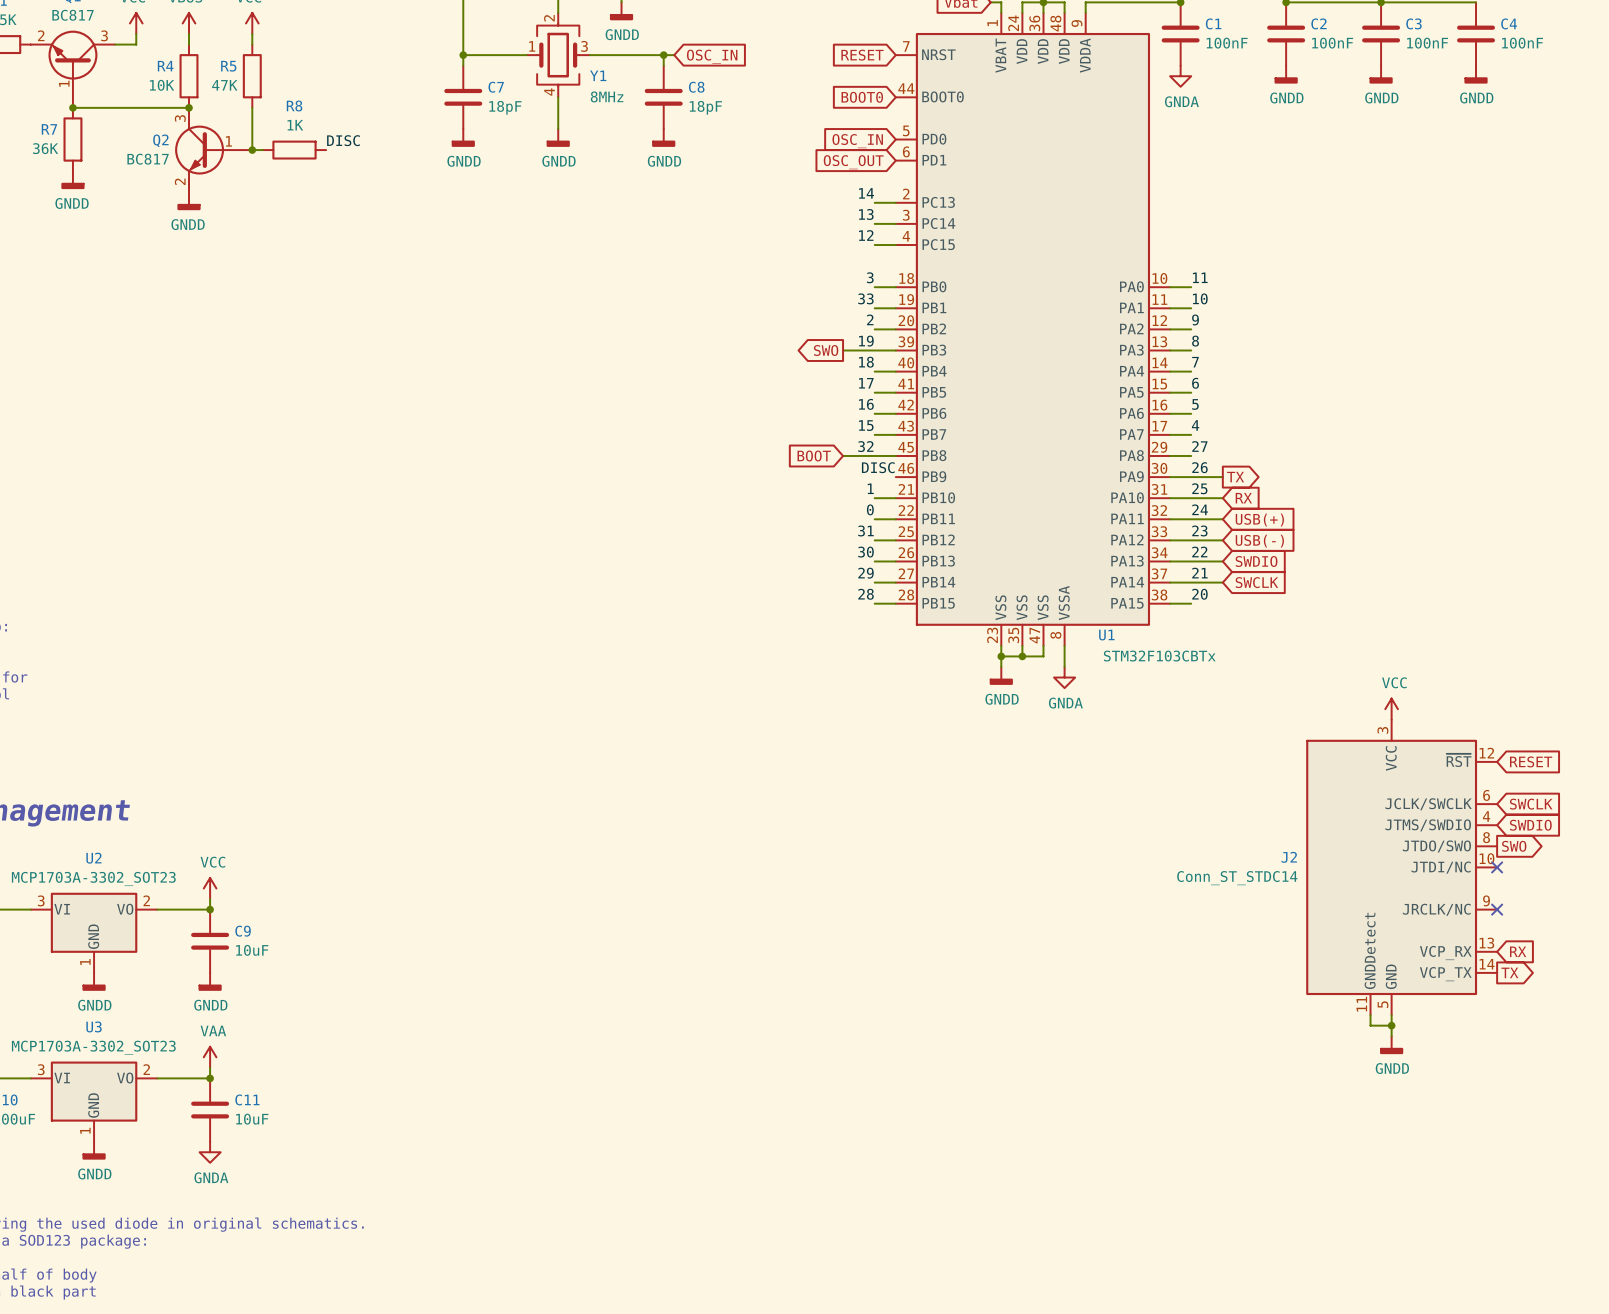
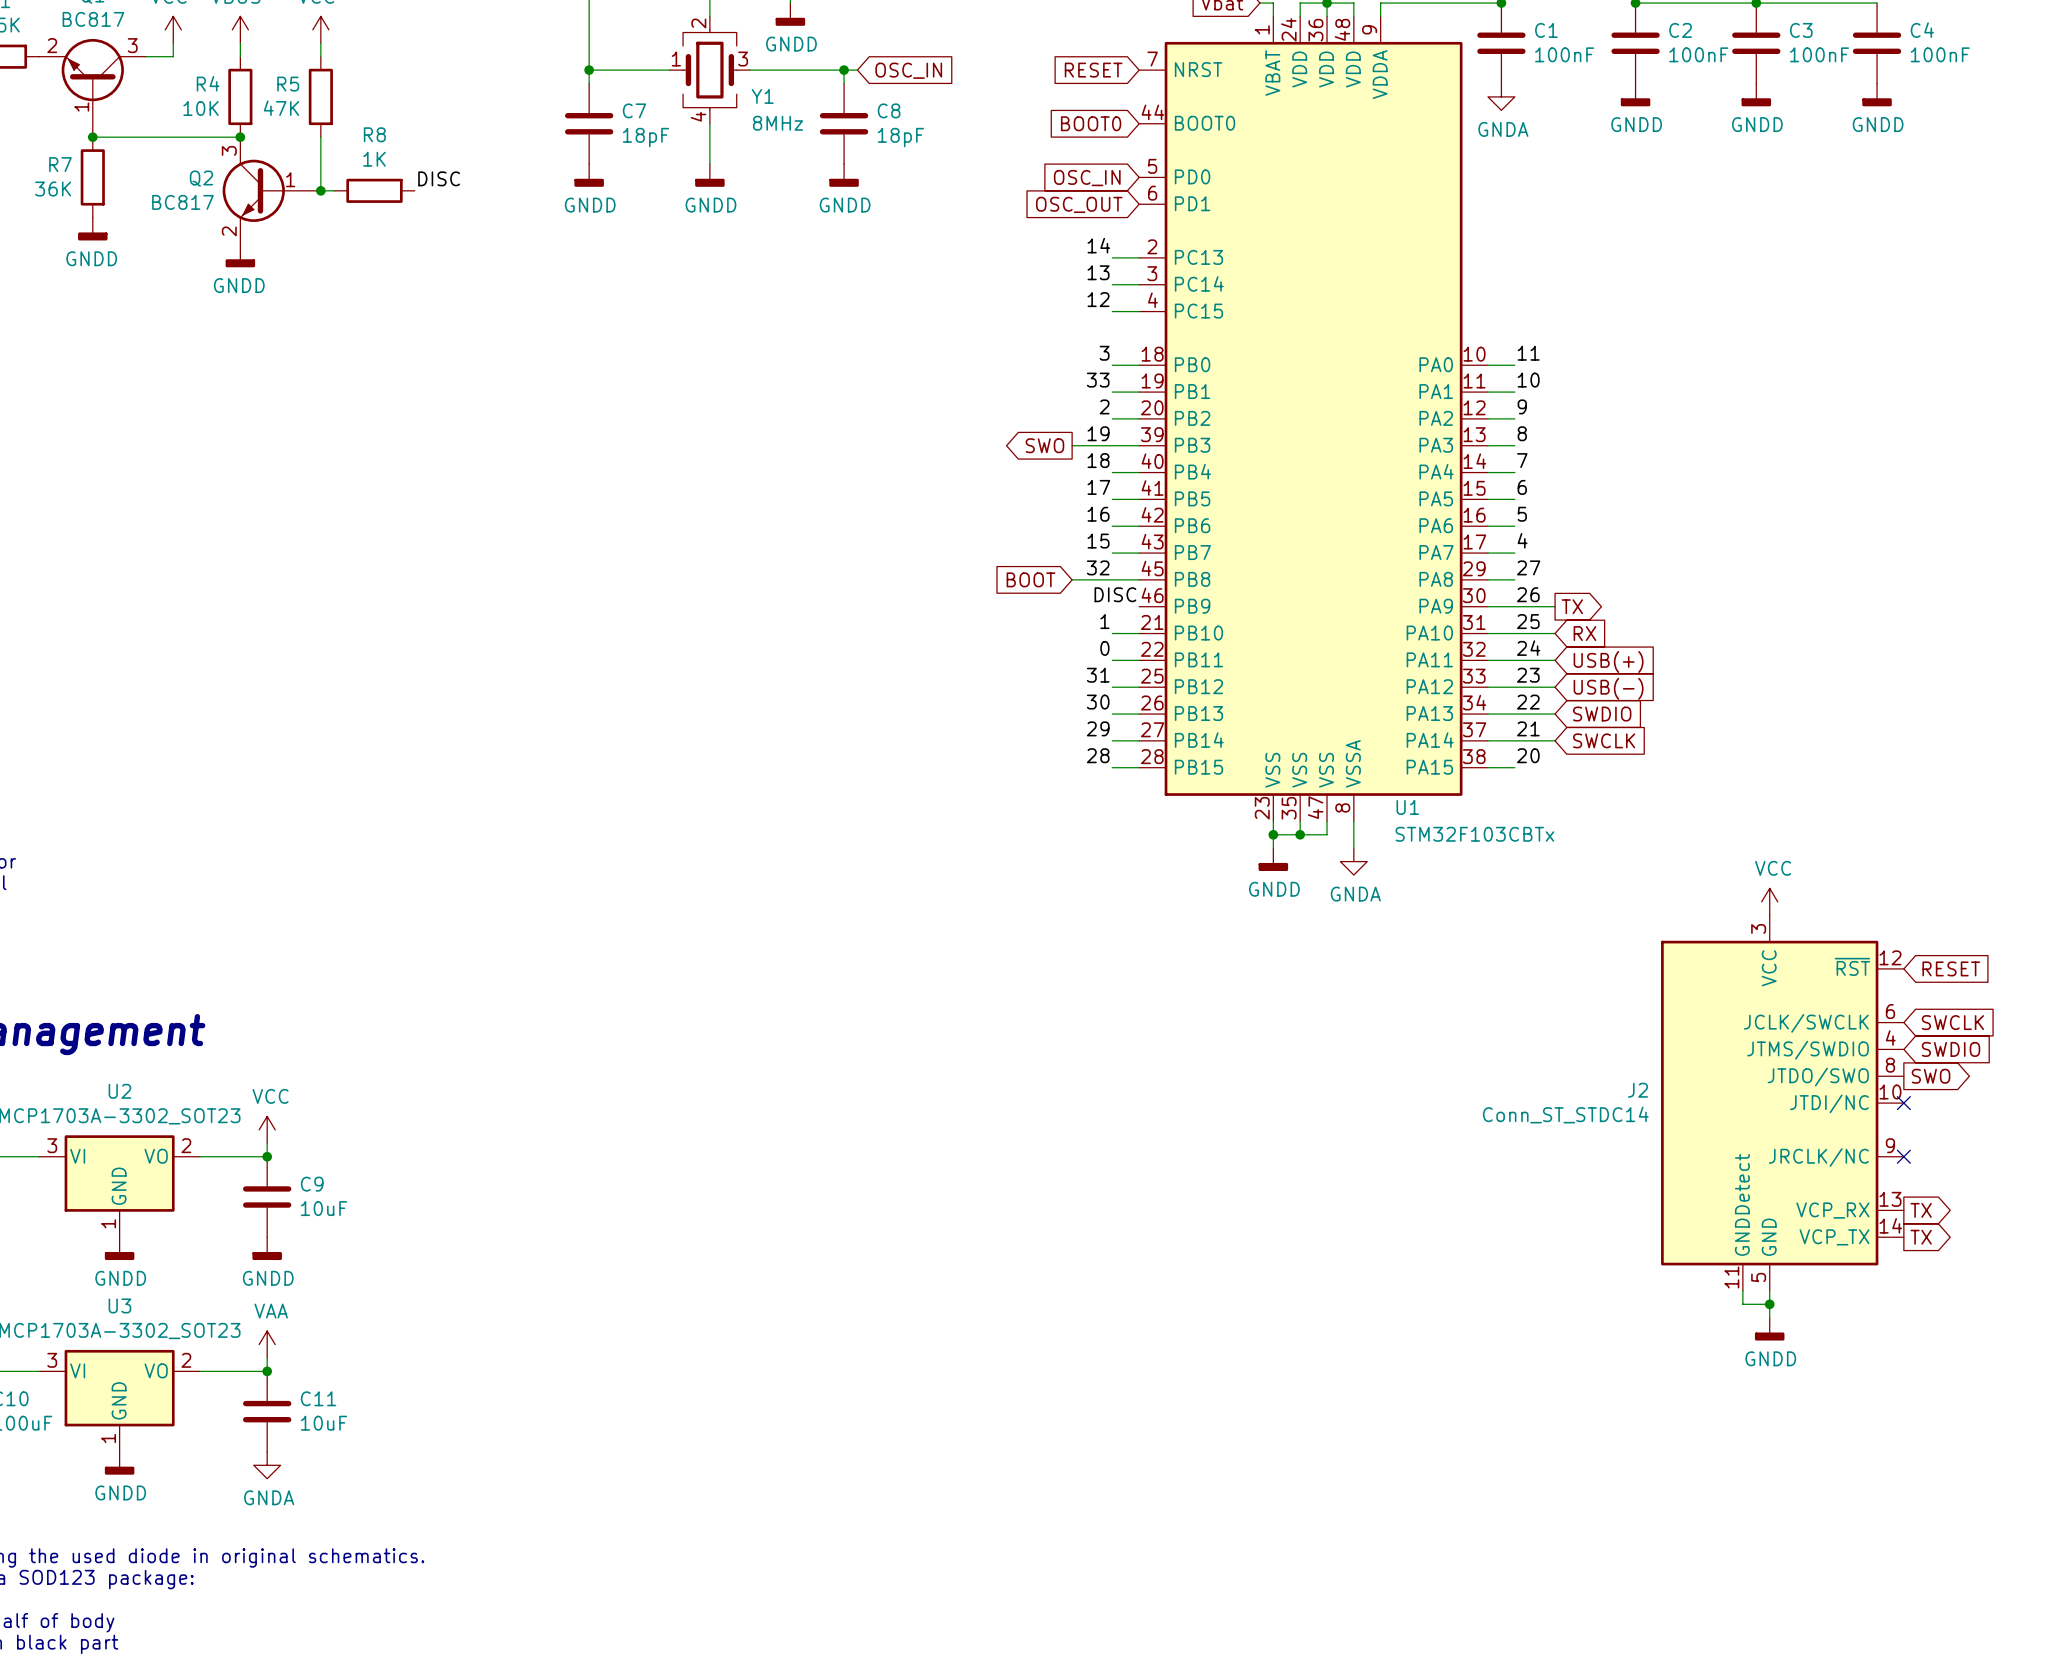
global label shape: input (1518, 951) -> output (1921, 1210)
global label: RX (1518, 951) -> TX (1921, 1210)

